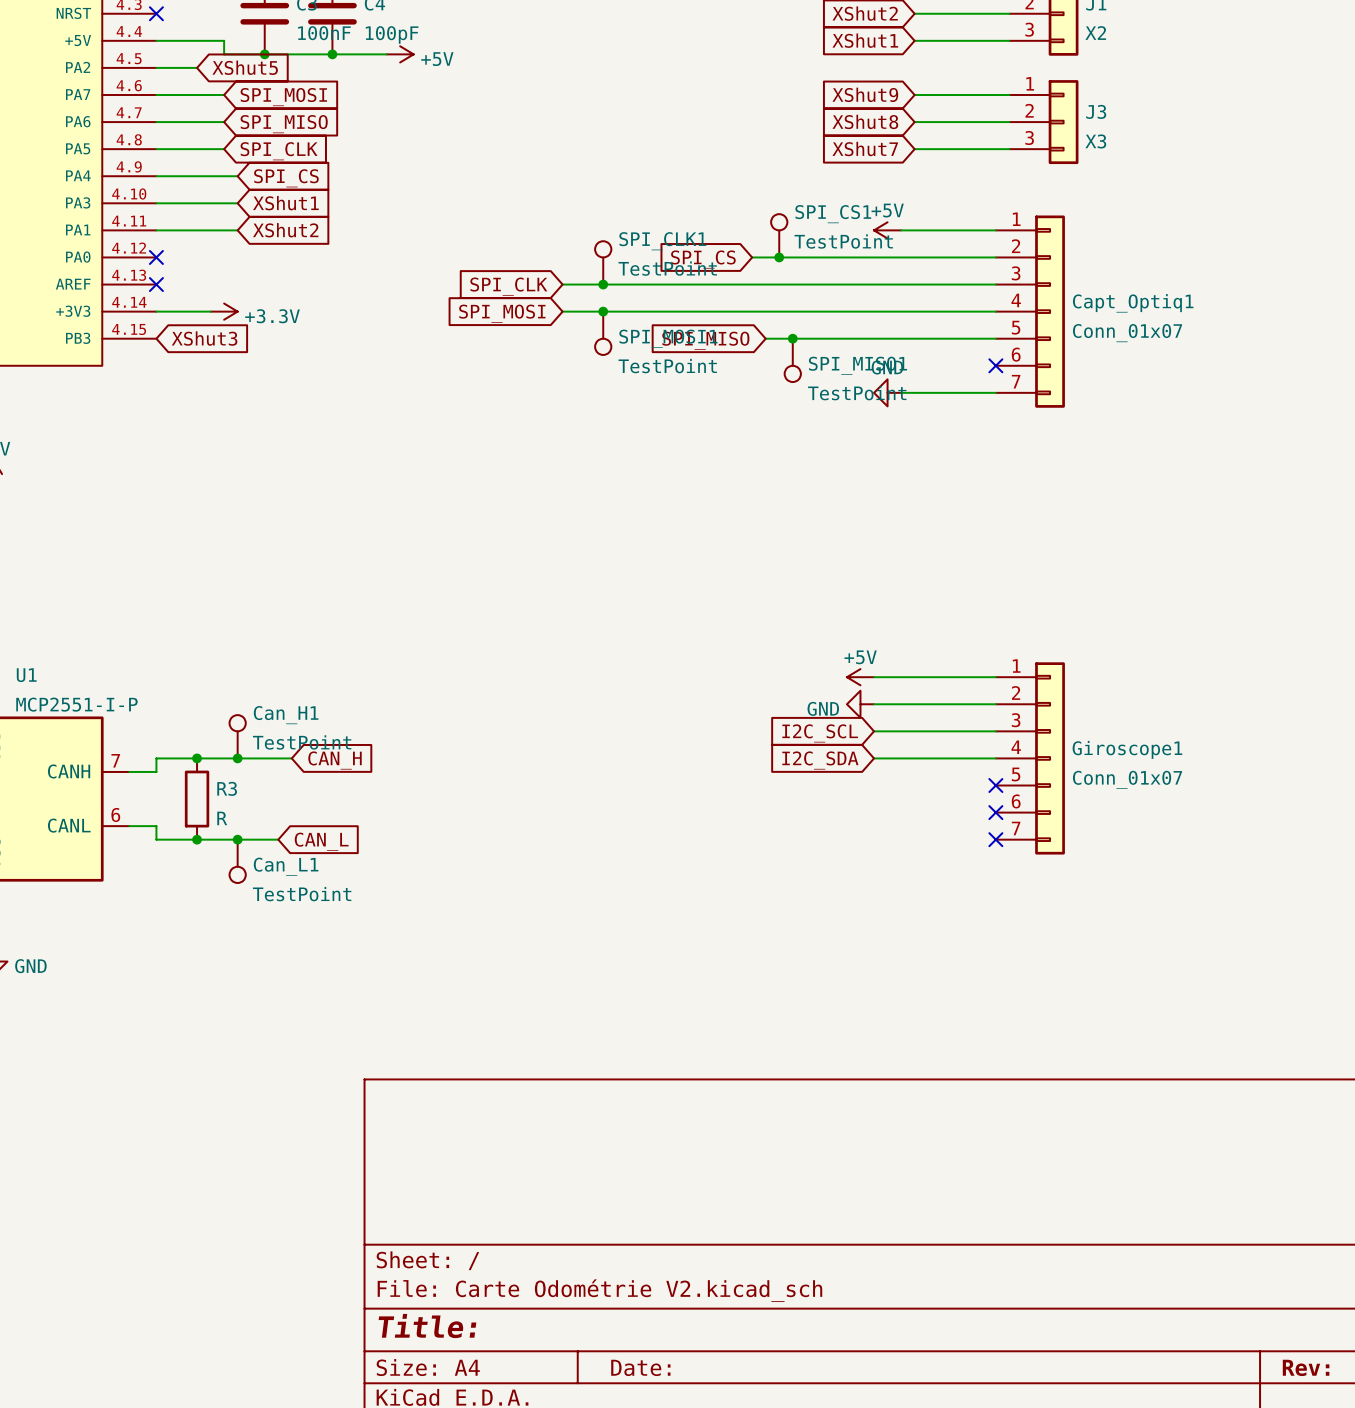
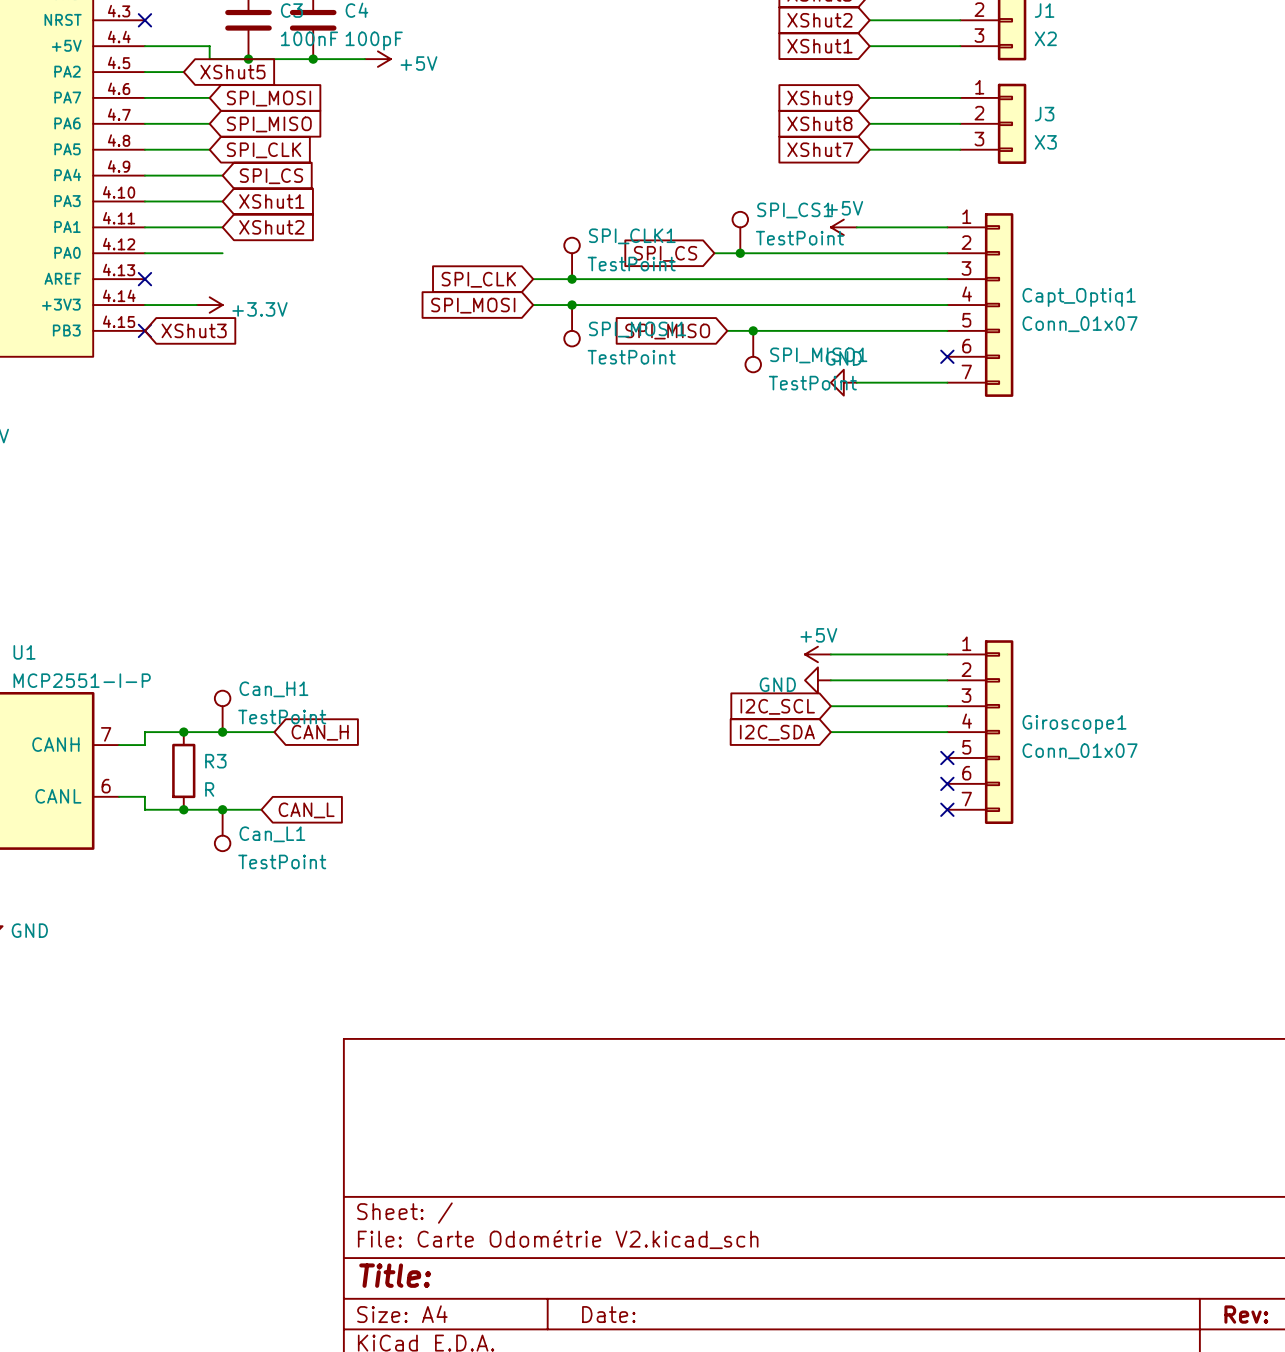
wire: none -> (144, 253) (222, 253)
no-connect mark: (156, 257) -> none
no-connect mark: none -> (144, 330)

